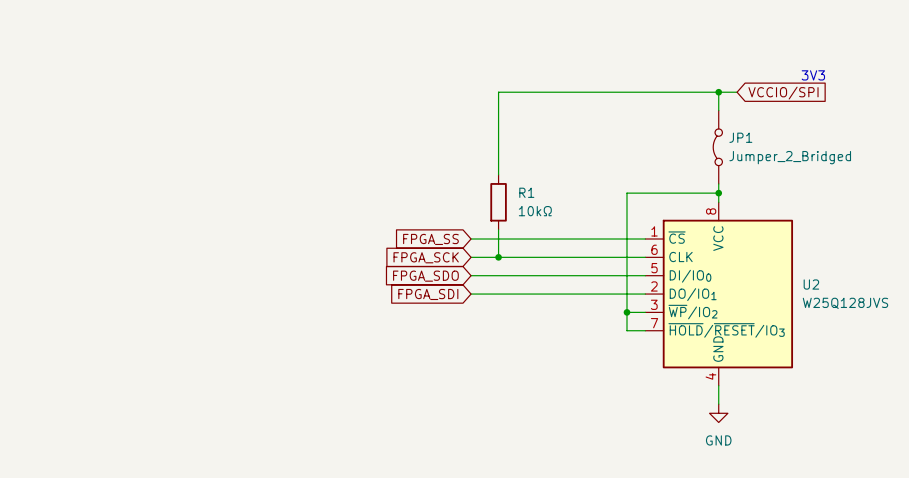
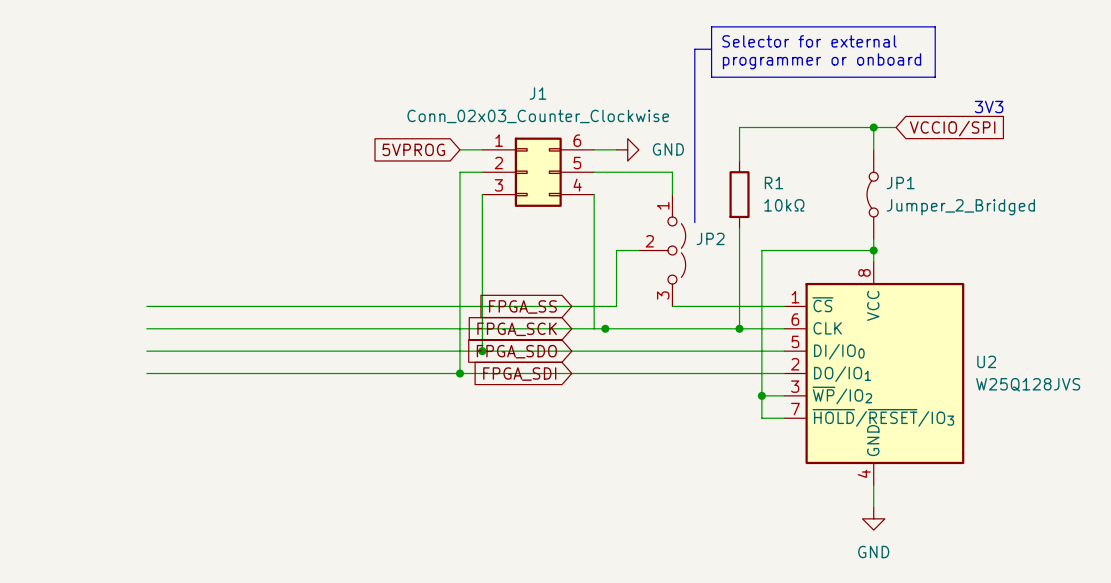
line: none -> (711, 26) (935, 26) (935, 77) (711, 77) (711, 26)
text: none -> Selector for external (809, 41)
line: none -> (711, 49) (694, 49) (694, 222)
text: none -> programmer or onboard (822, 61)
wire: (608, 92) (498, 92) (498, 174) -> (739, 127) (739, 161)
global label: none -> 5VPROG (413, 149)
wire: none -> (459, 149) (482, 149)
wire: none -> (594, 149) (616, 149)
power symbol: none -> GND (627, 149)
wire: none -> (482, 172) (459, 172) (459, 373)
J1: none -> Conn_02x03_Counter_Clockwise (538, 172)
wire: none -> (594, 172) (672, 172) (672, 194)
wire: none -> (482, 194) (482, 351)
wire: none -> (594, 194) (594, 328)
wire: none -> (739, 228) (739, 328)
JP2: none -> (662, 250)
R1 position: (498, 202) -> (739, 194)
wire: (498, 229) (498, 257) -> none
wire: none -> (146, 306) (571, 306)
wire: (507, 239) (553, 239) -> (616, 306) (616, 250) (638, 250)
wire: none -> (146, 328) (571, 328)
junction: none -> (739, 328)
wire: none -> (146, 351) (571, 351)
junction: none -> (482, 351)
wire: none -> (146, 373) (571, 373)
junction: none -> (459, 373)

